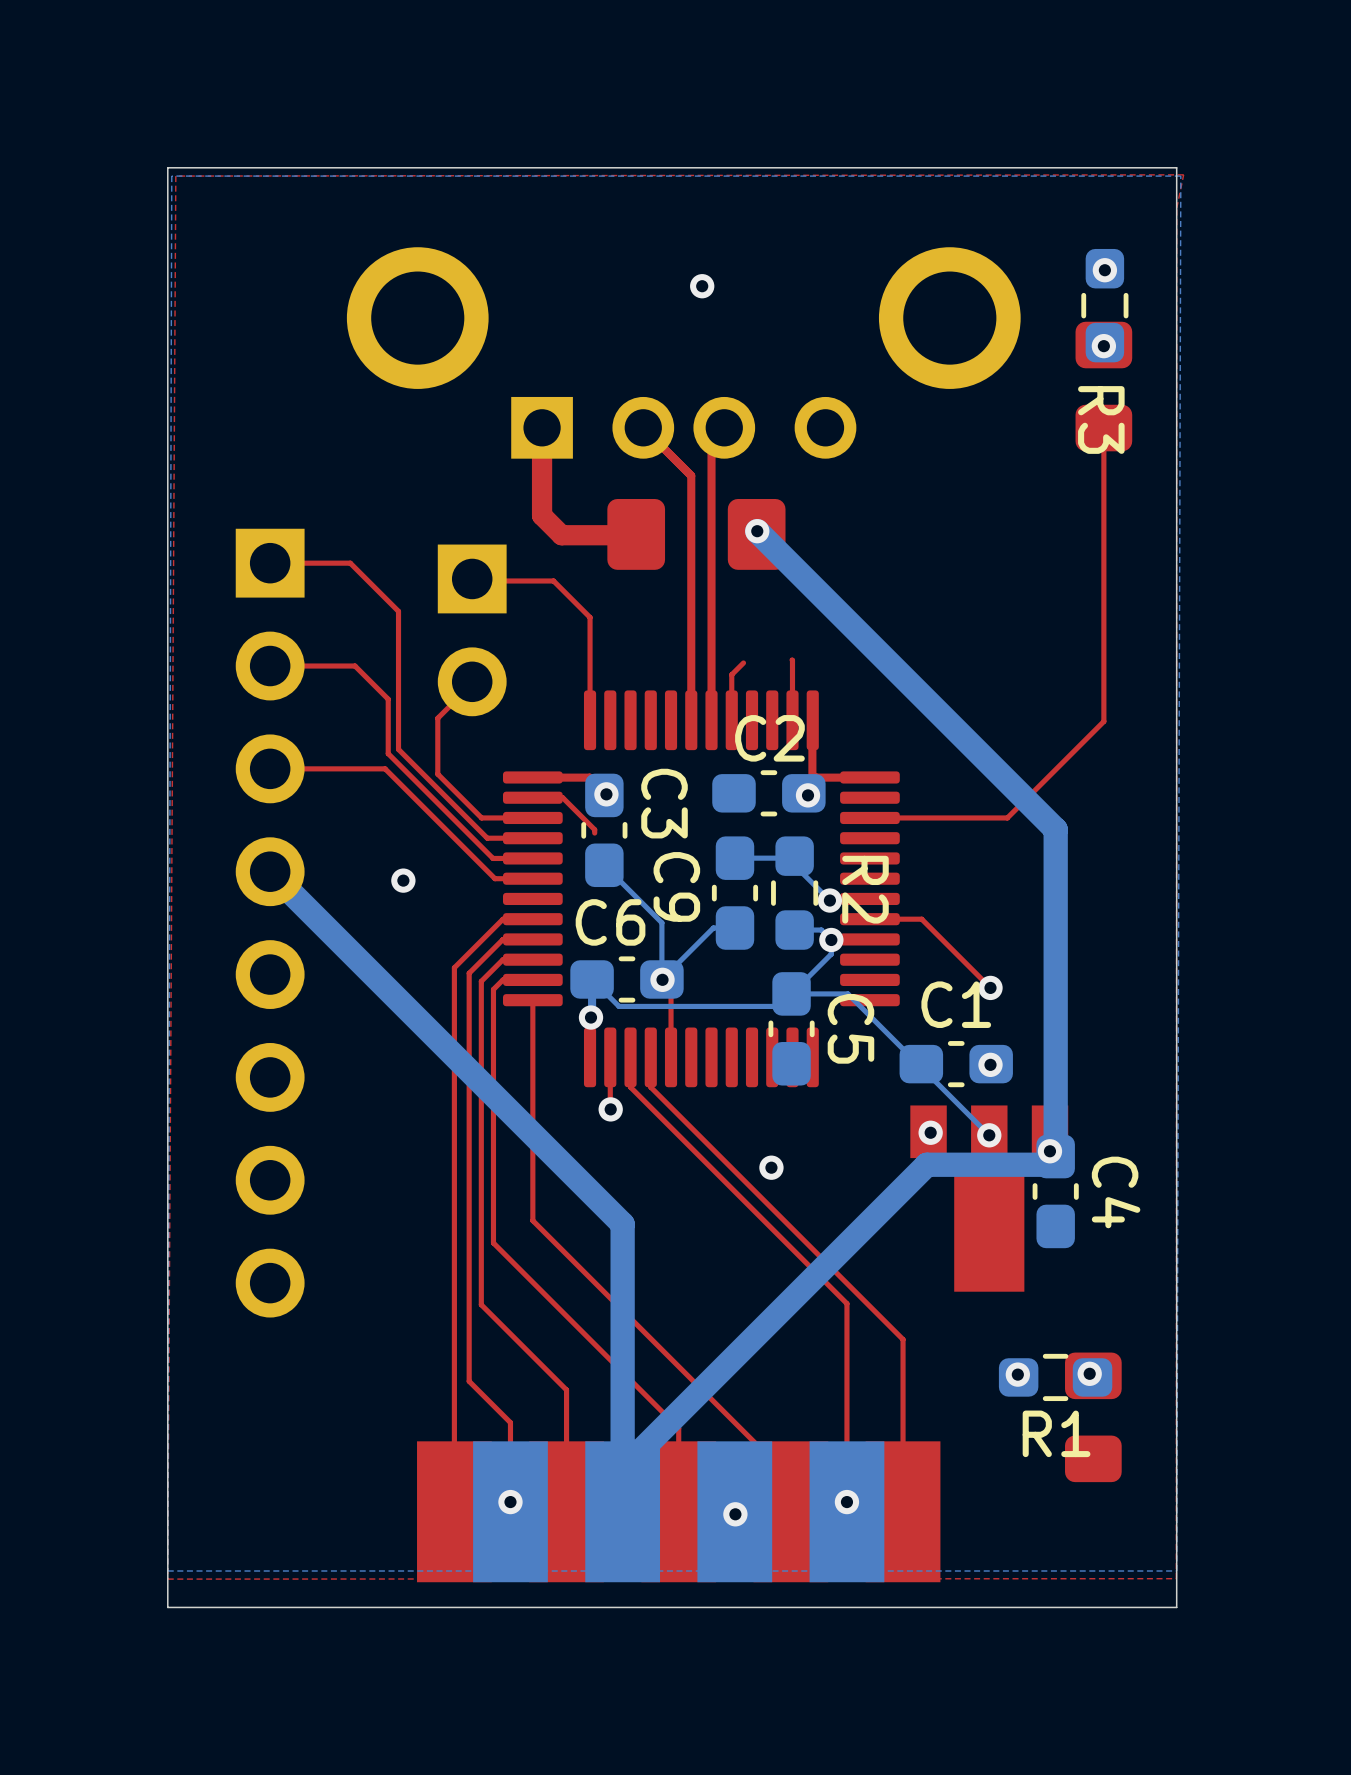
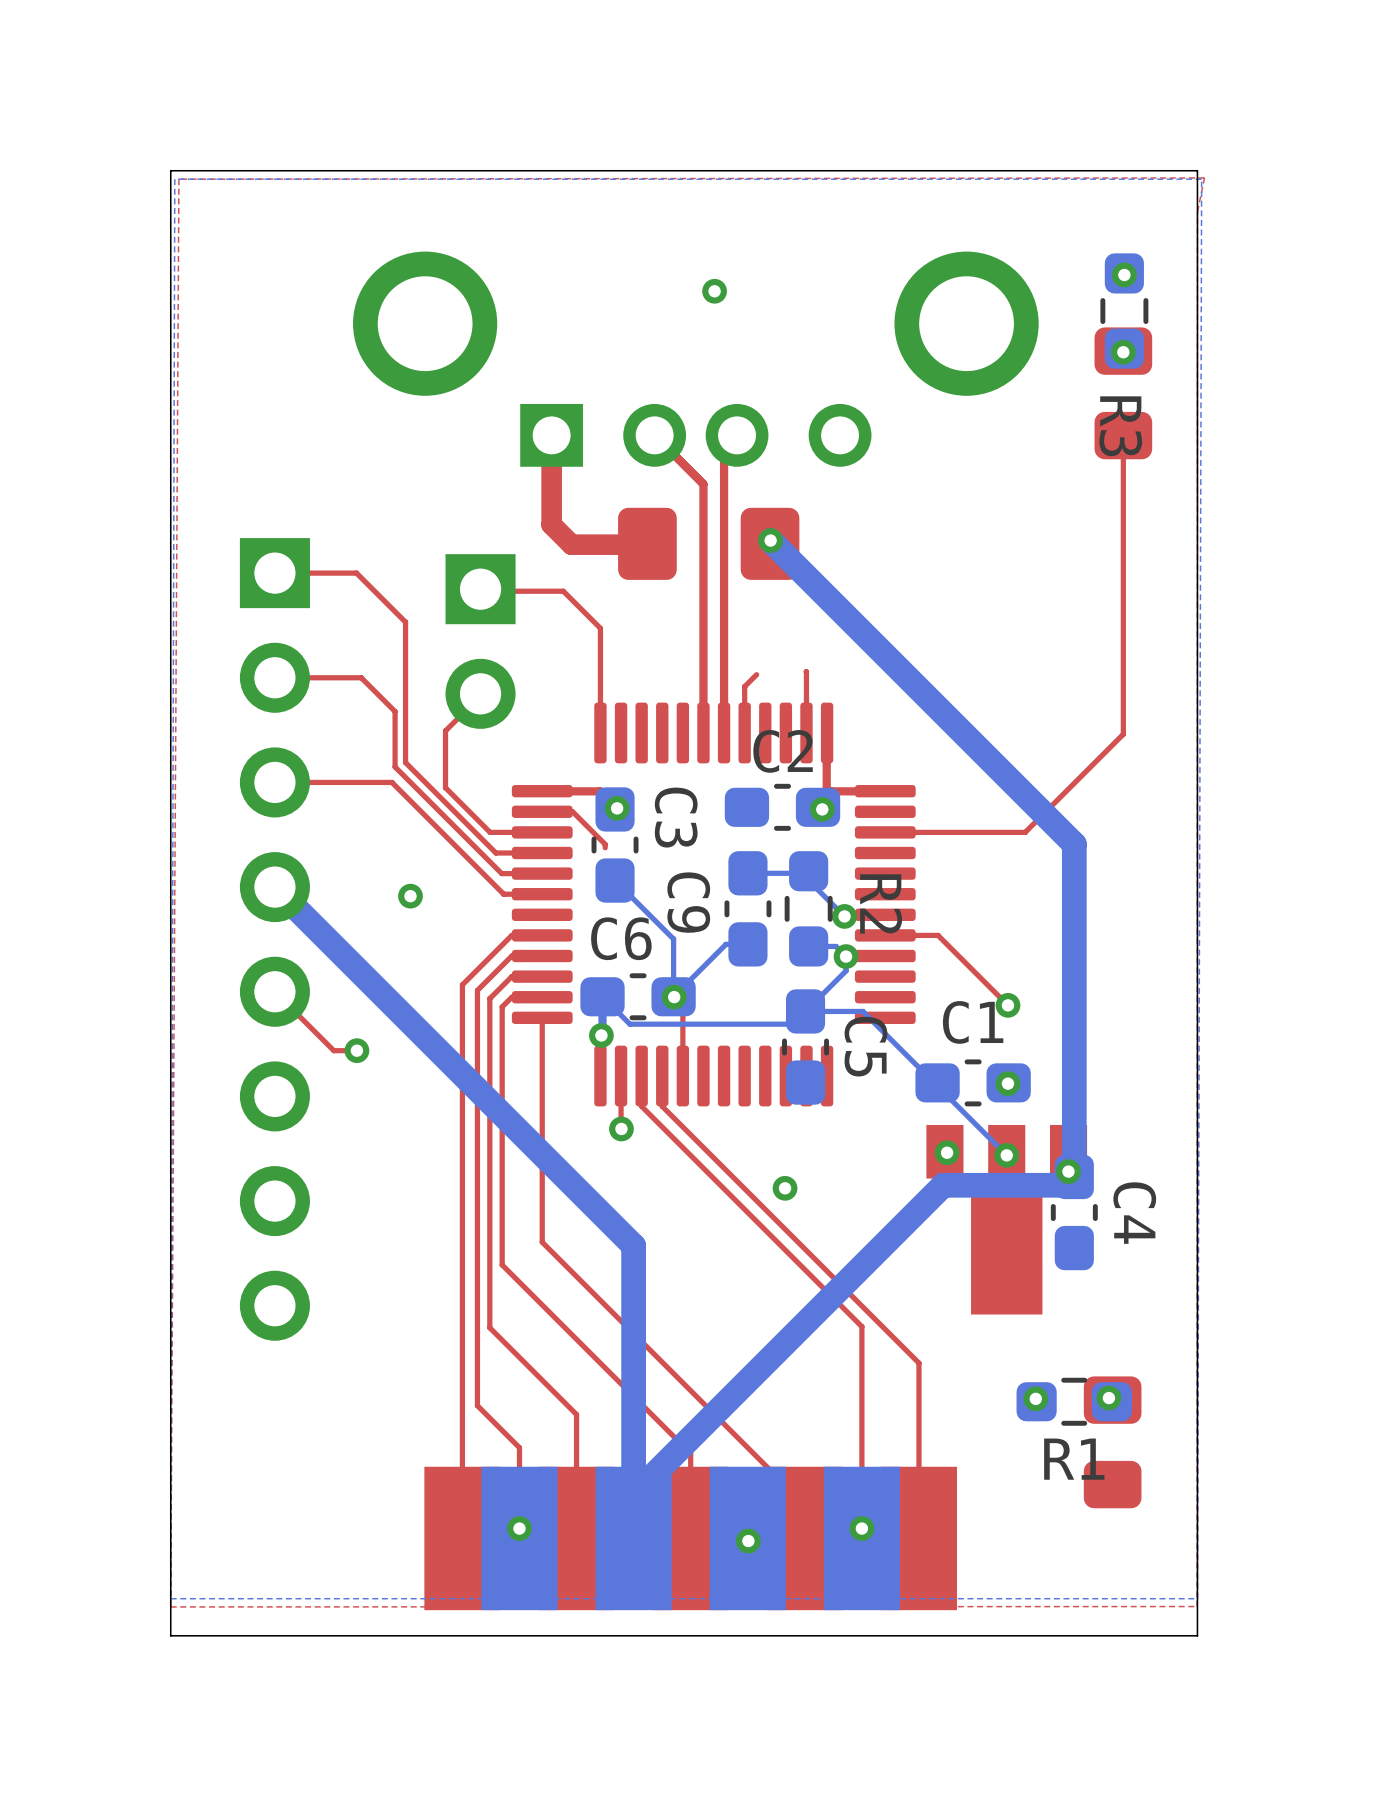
top track: none -> (274, 991) (333, 1050) (356, 1050)
via: none -> (356, 1050)

